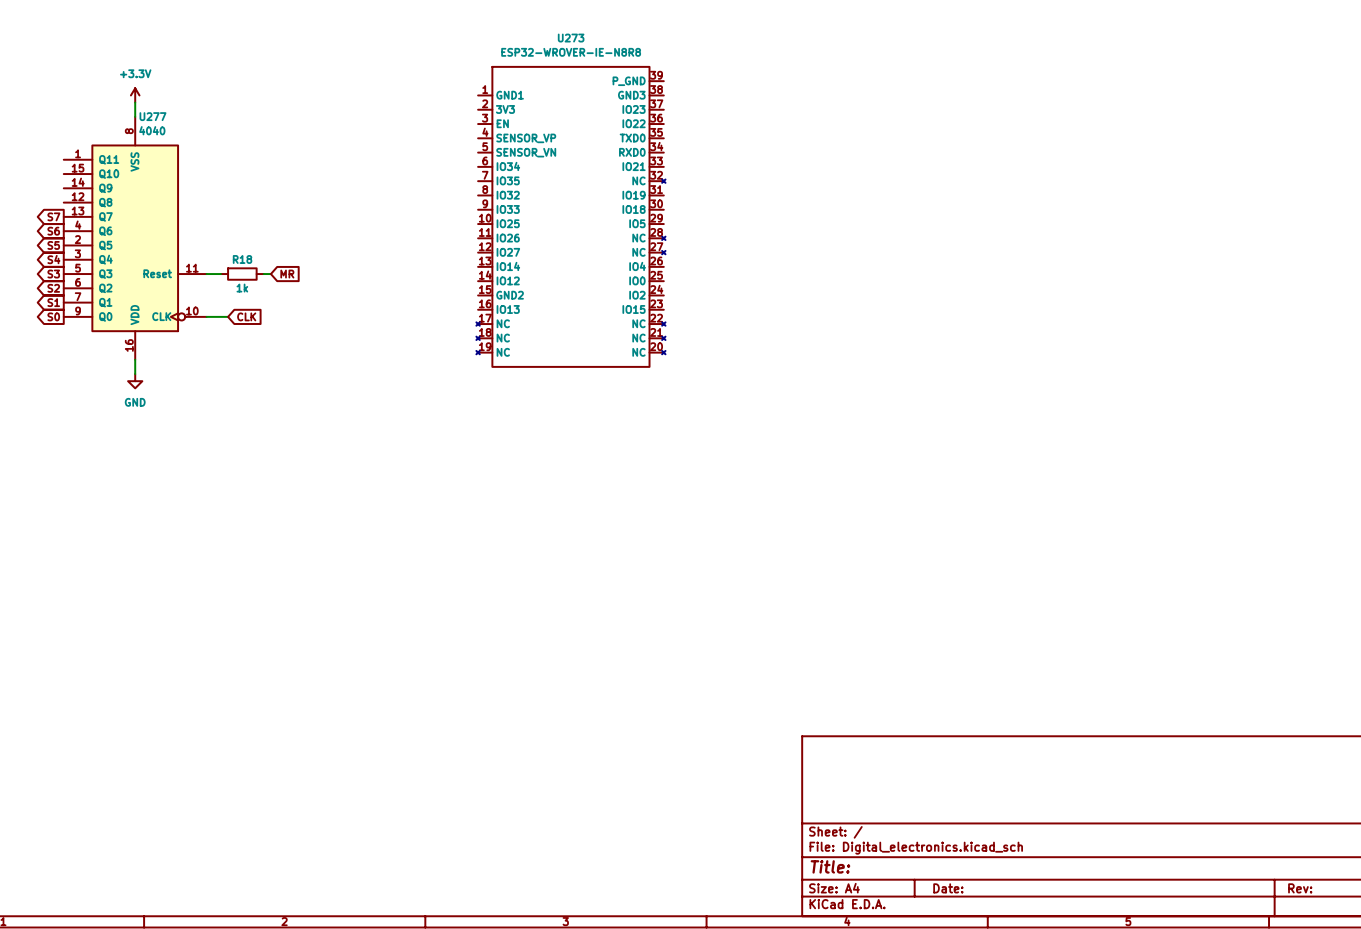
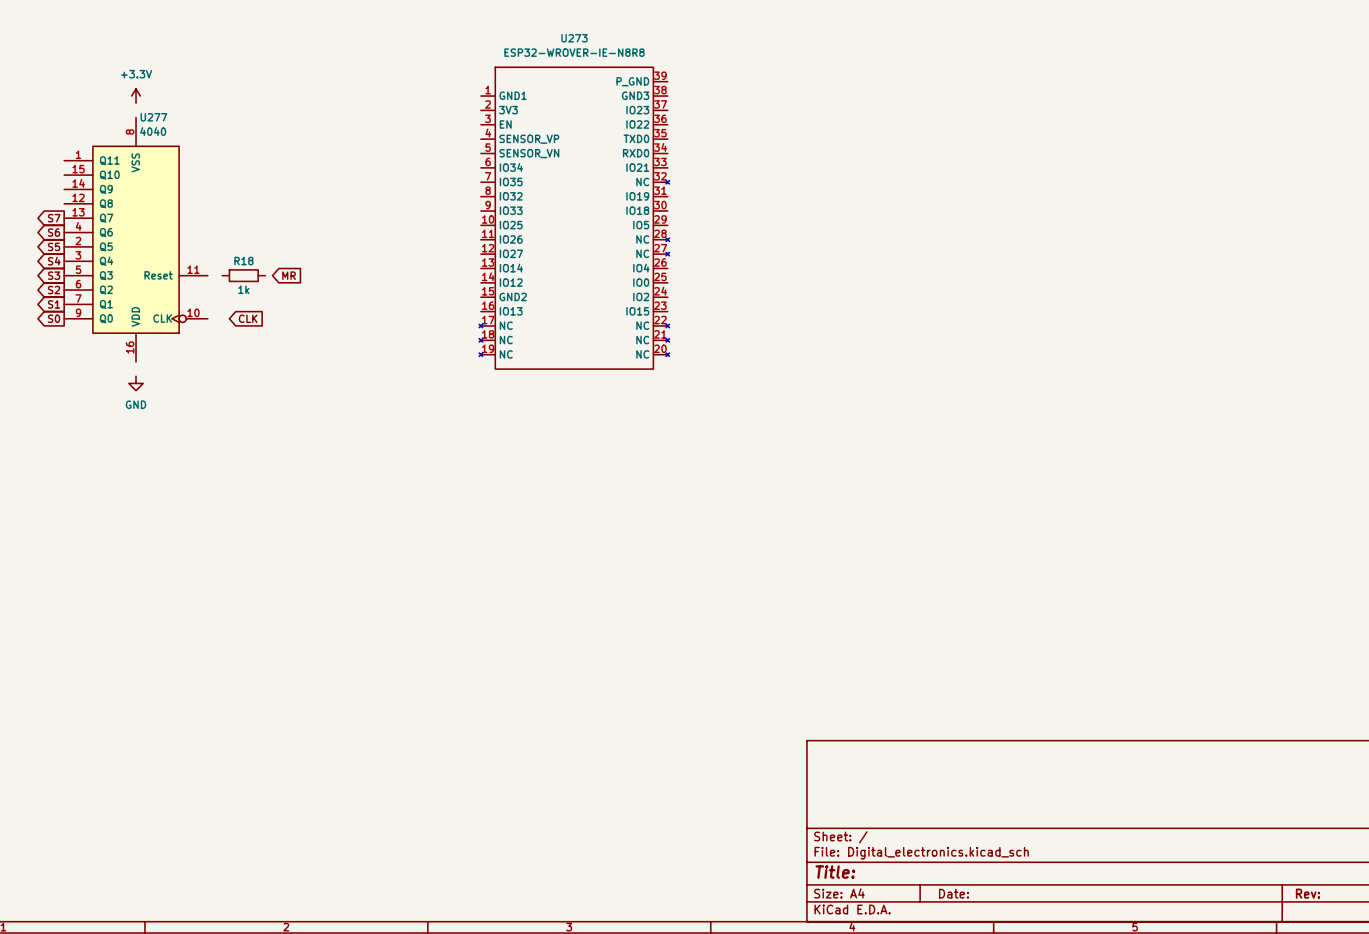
wire: (135, 102) (135, 116) -> none
wire: (206, 274) (220, 274) -> none
wire: (263, 274) (270, 274) -> none
wire: (206, 316) (228, 316) -> none
wire: (135, 359) (135, 374) -> none

